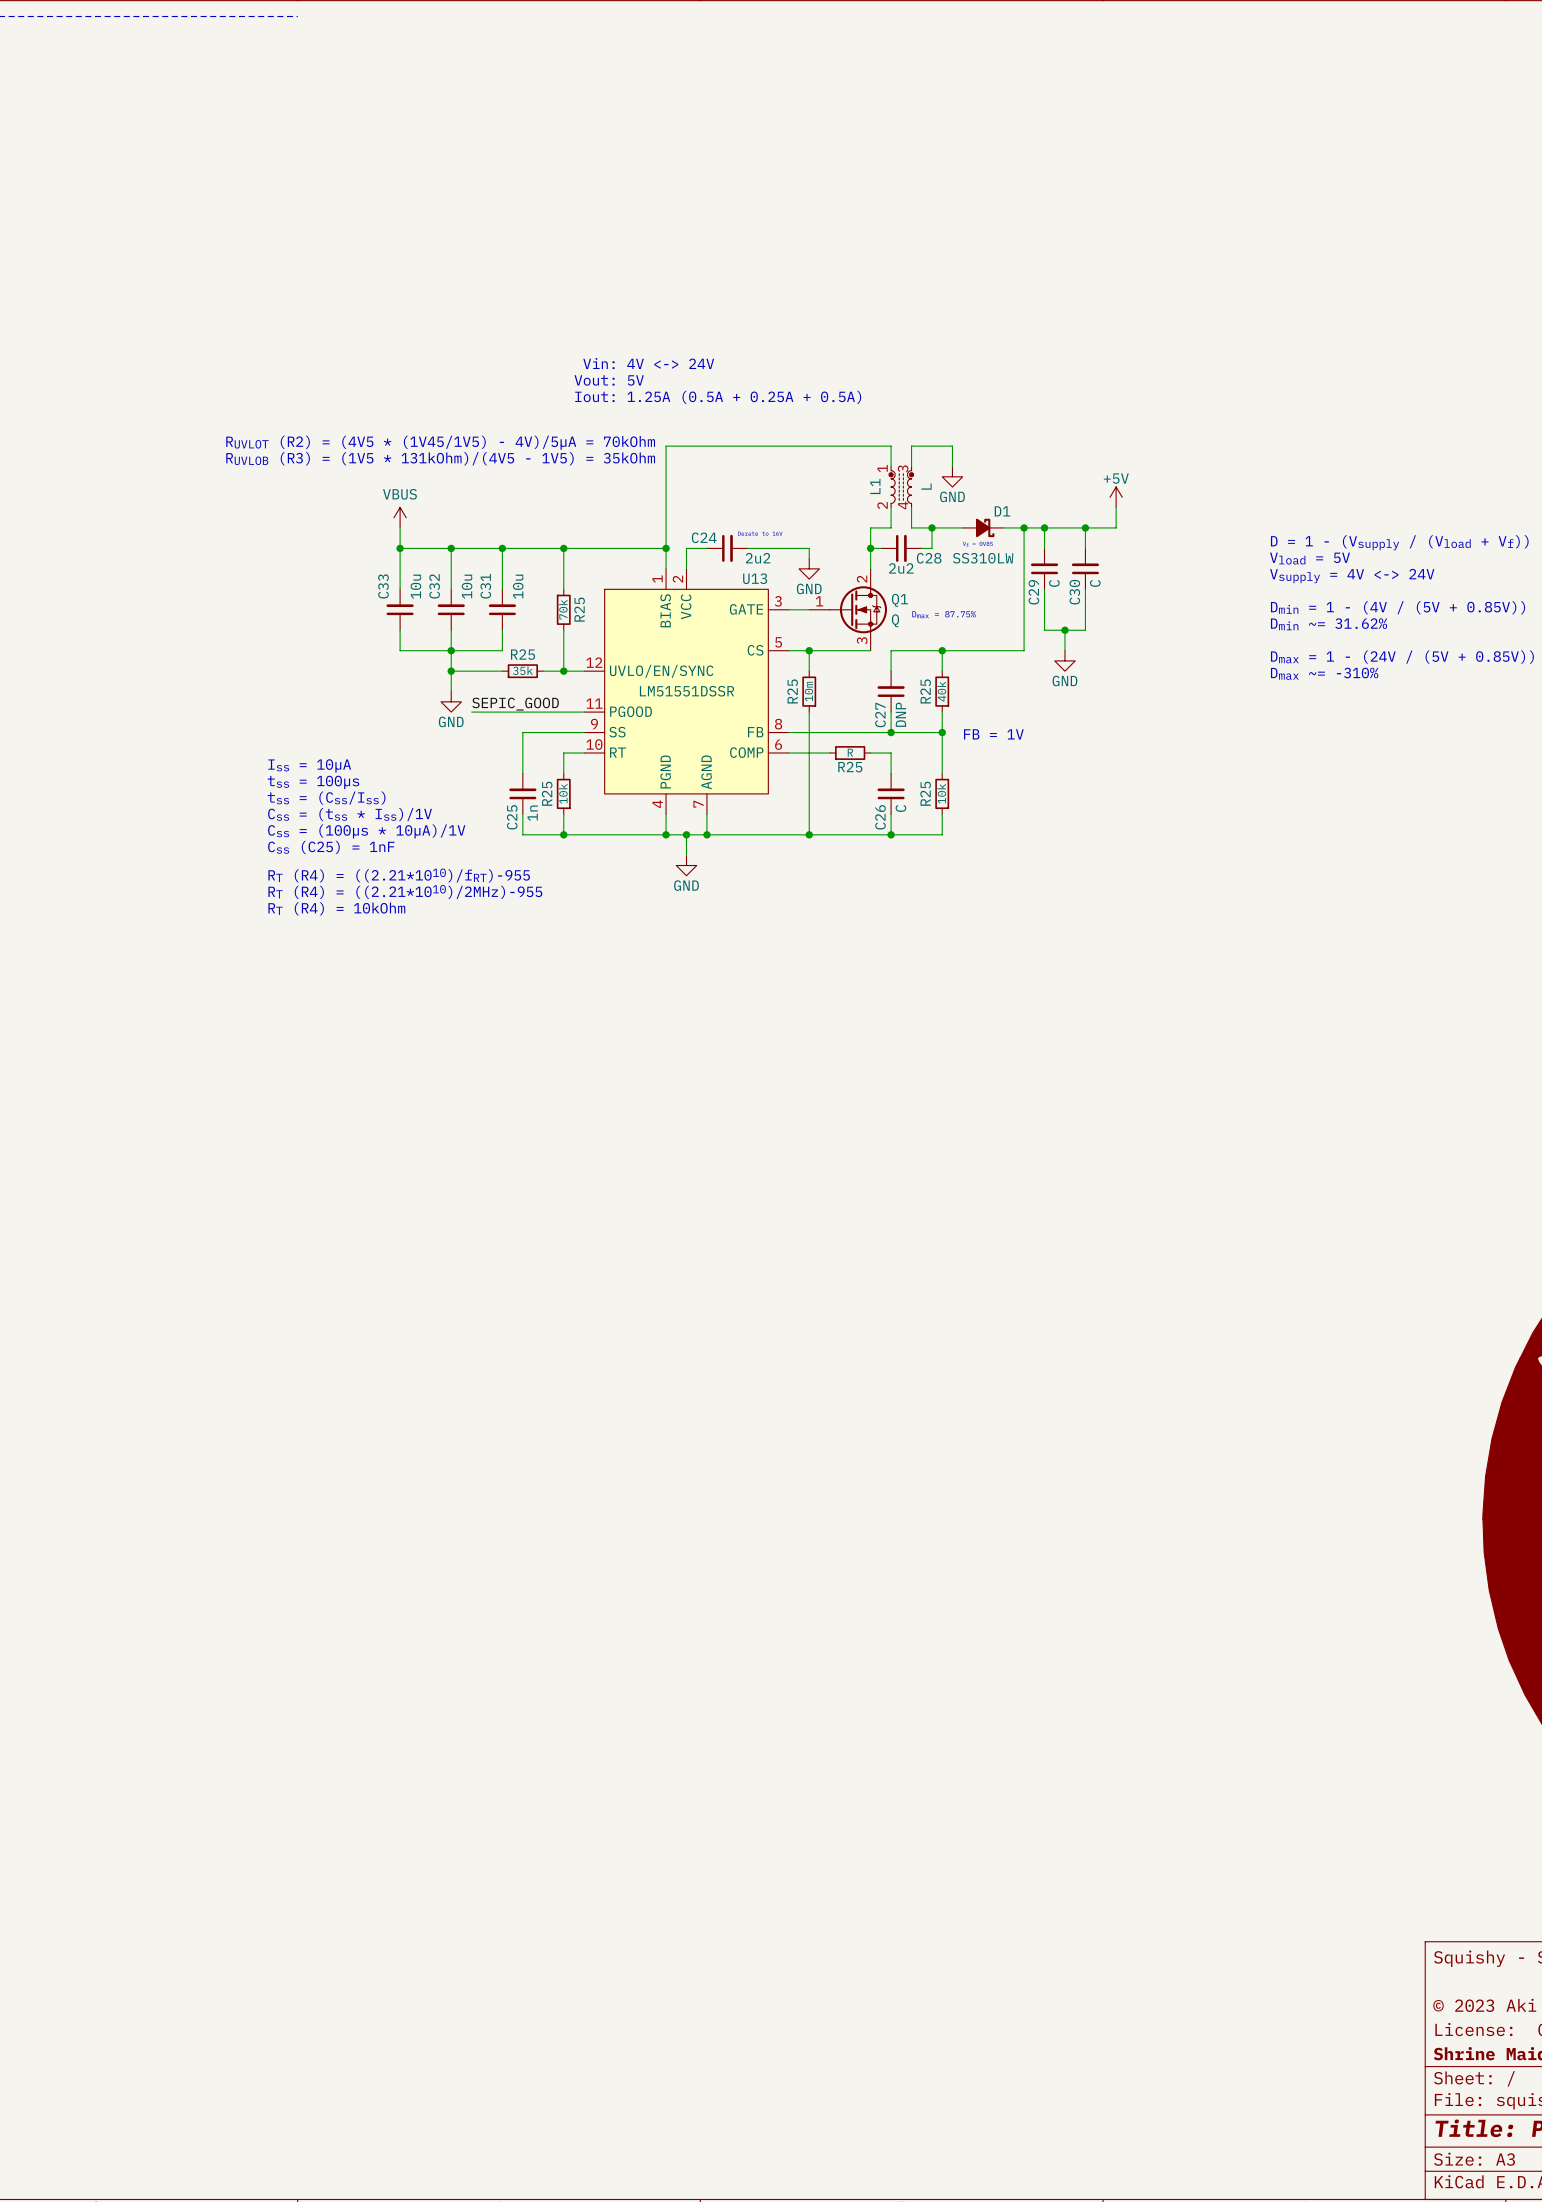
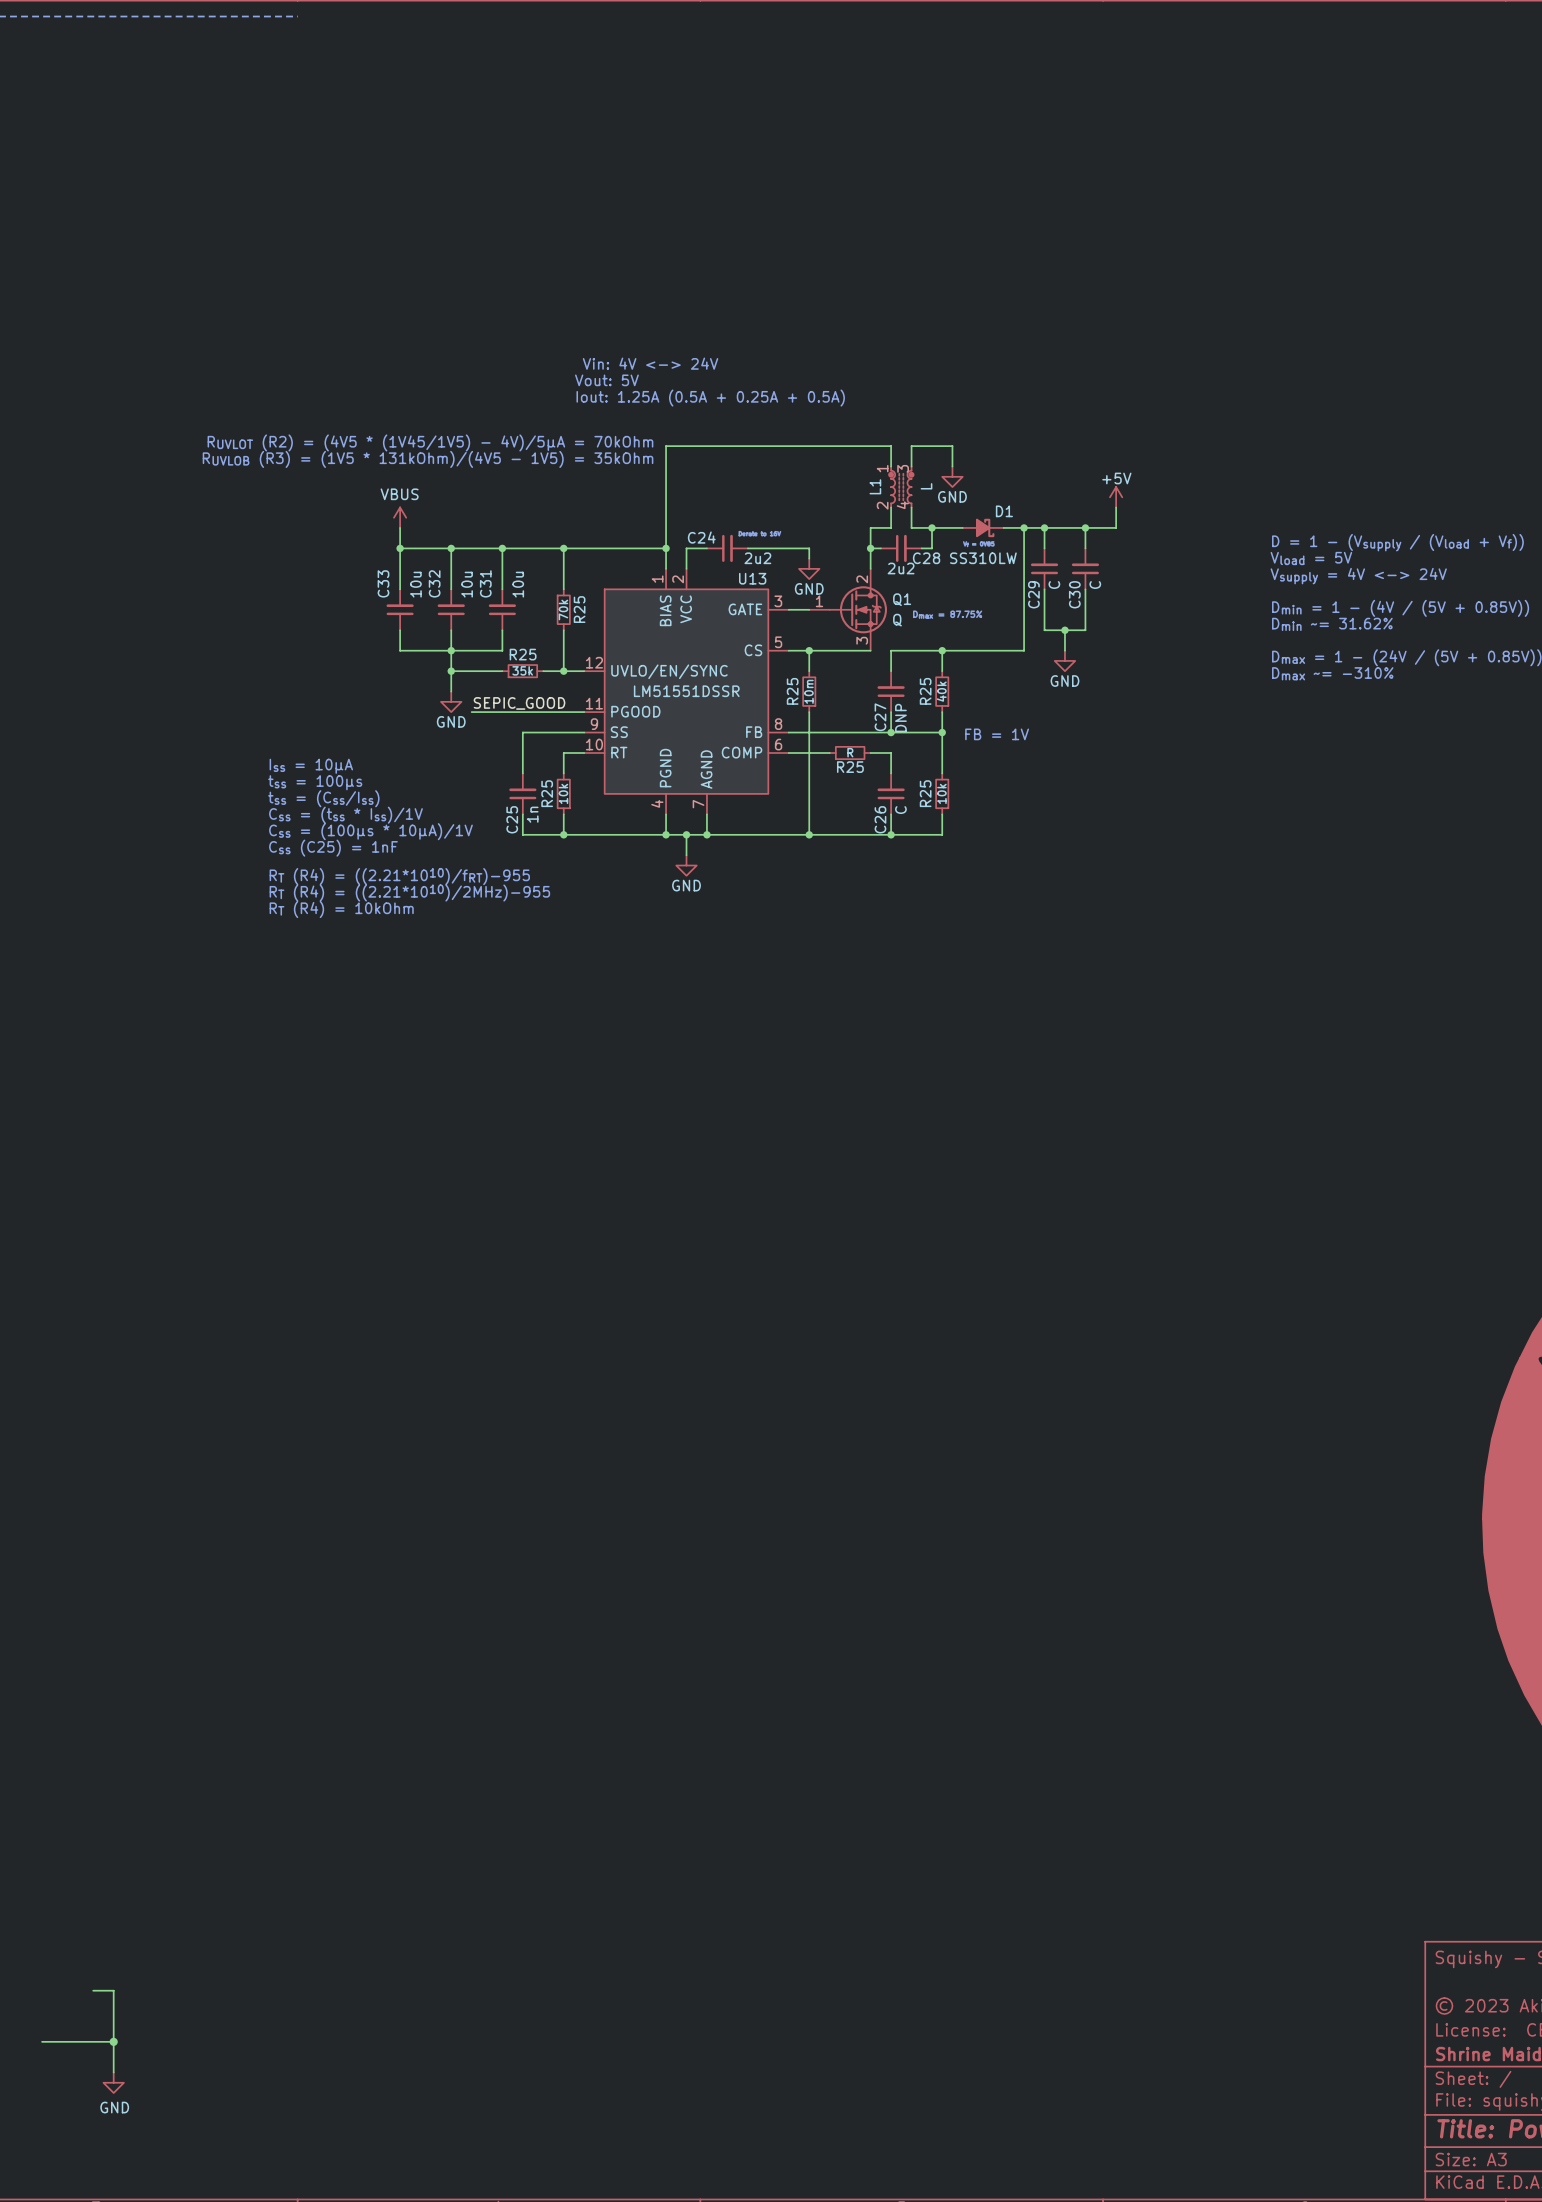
wire: none -> (93, 1990) (113, 1990) (113, 2072)
wire: none -> (42, 2041) (113, 2041)
junction: none -> (113, 2041)
power symbol: none -> GND (113, 2082)

